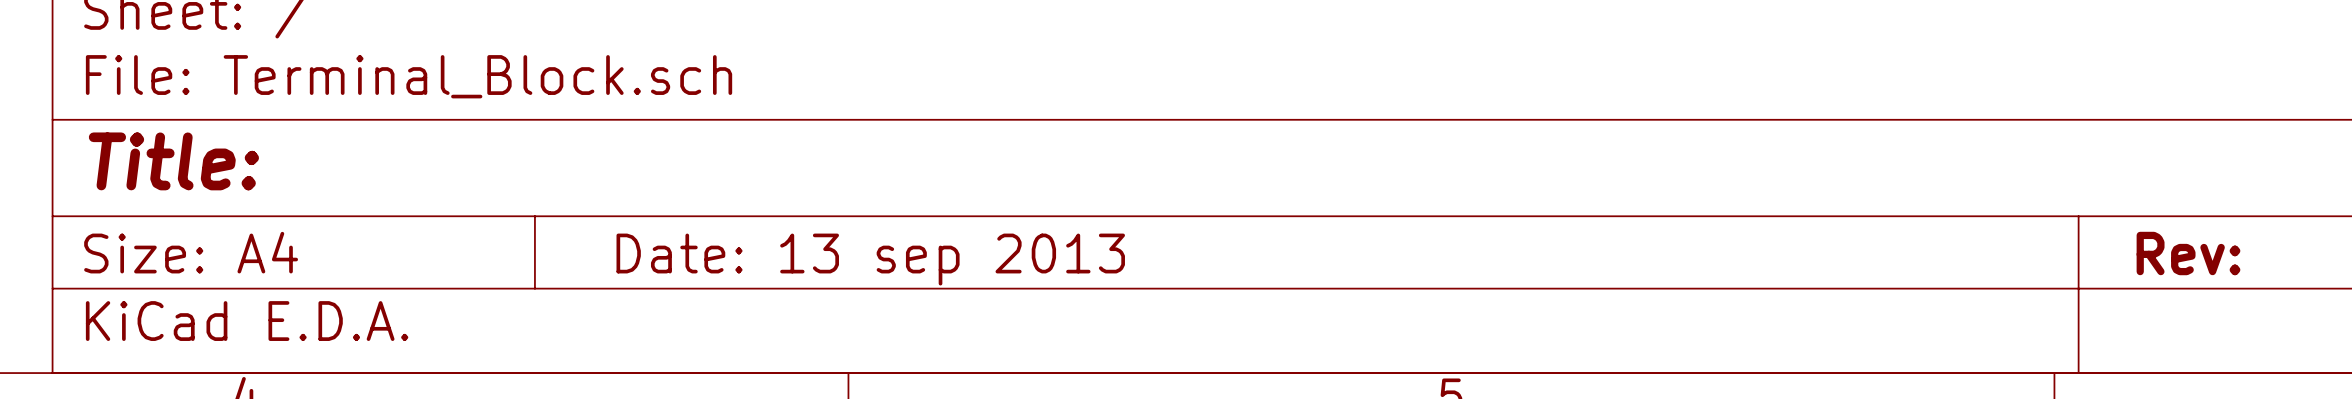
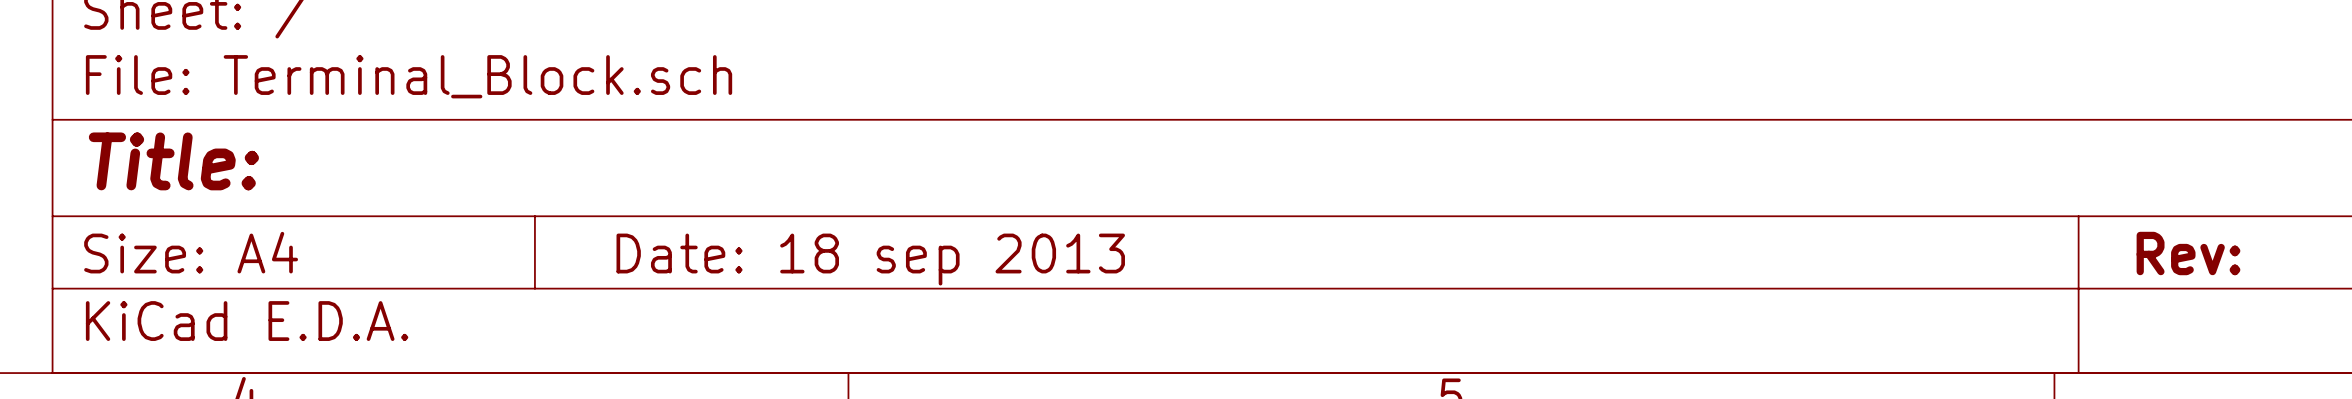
title block: Date: 13 sep 2013 (870, 259) -> Date: 18 sep 2013 (870, 259)

